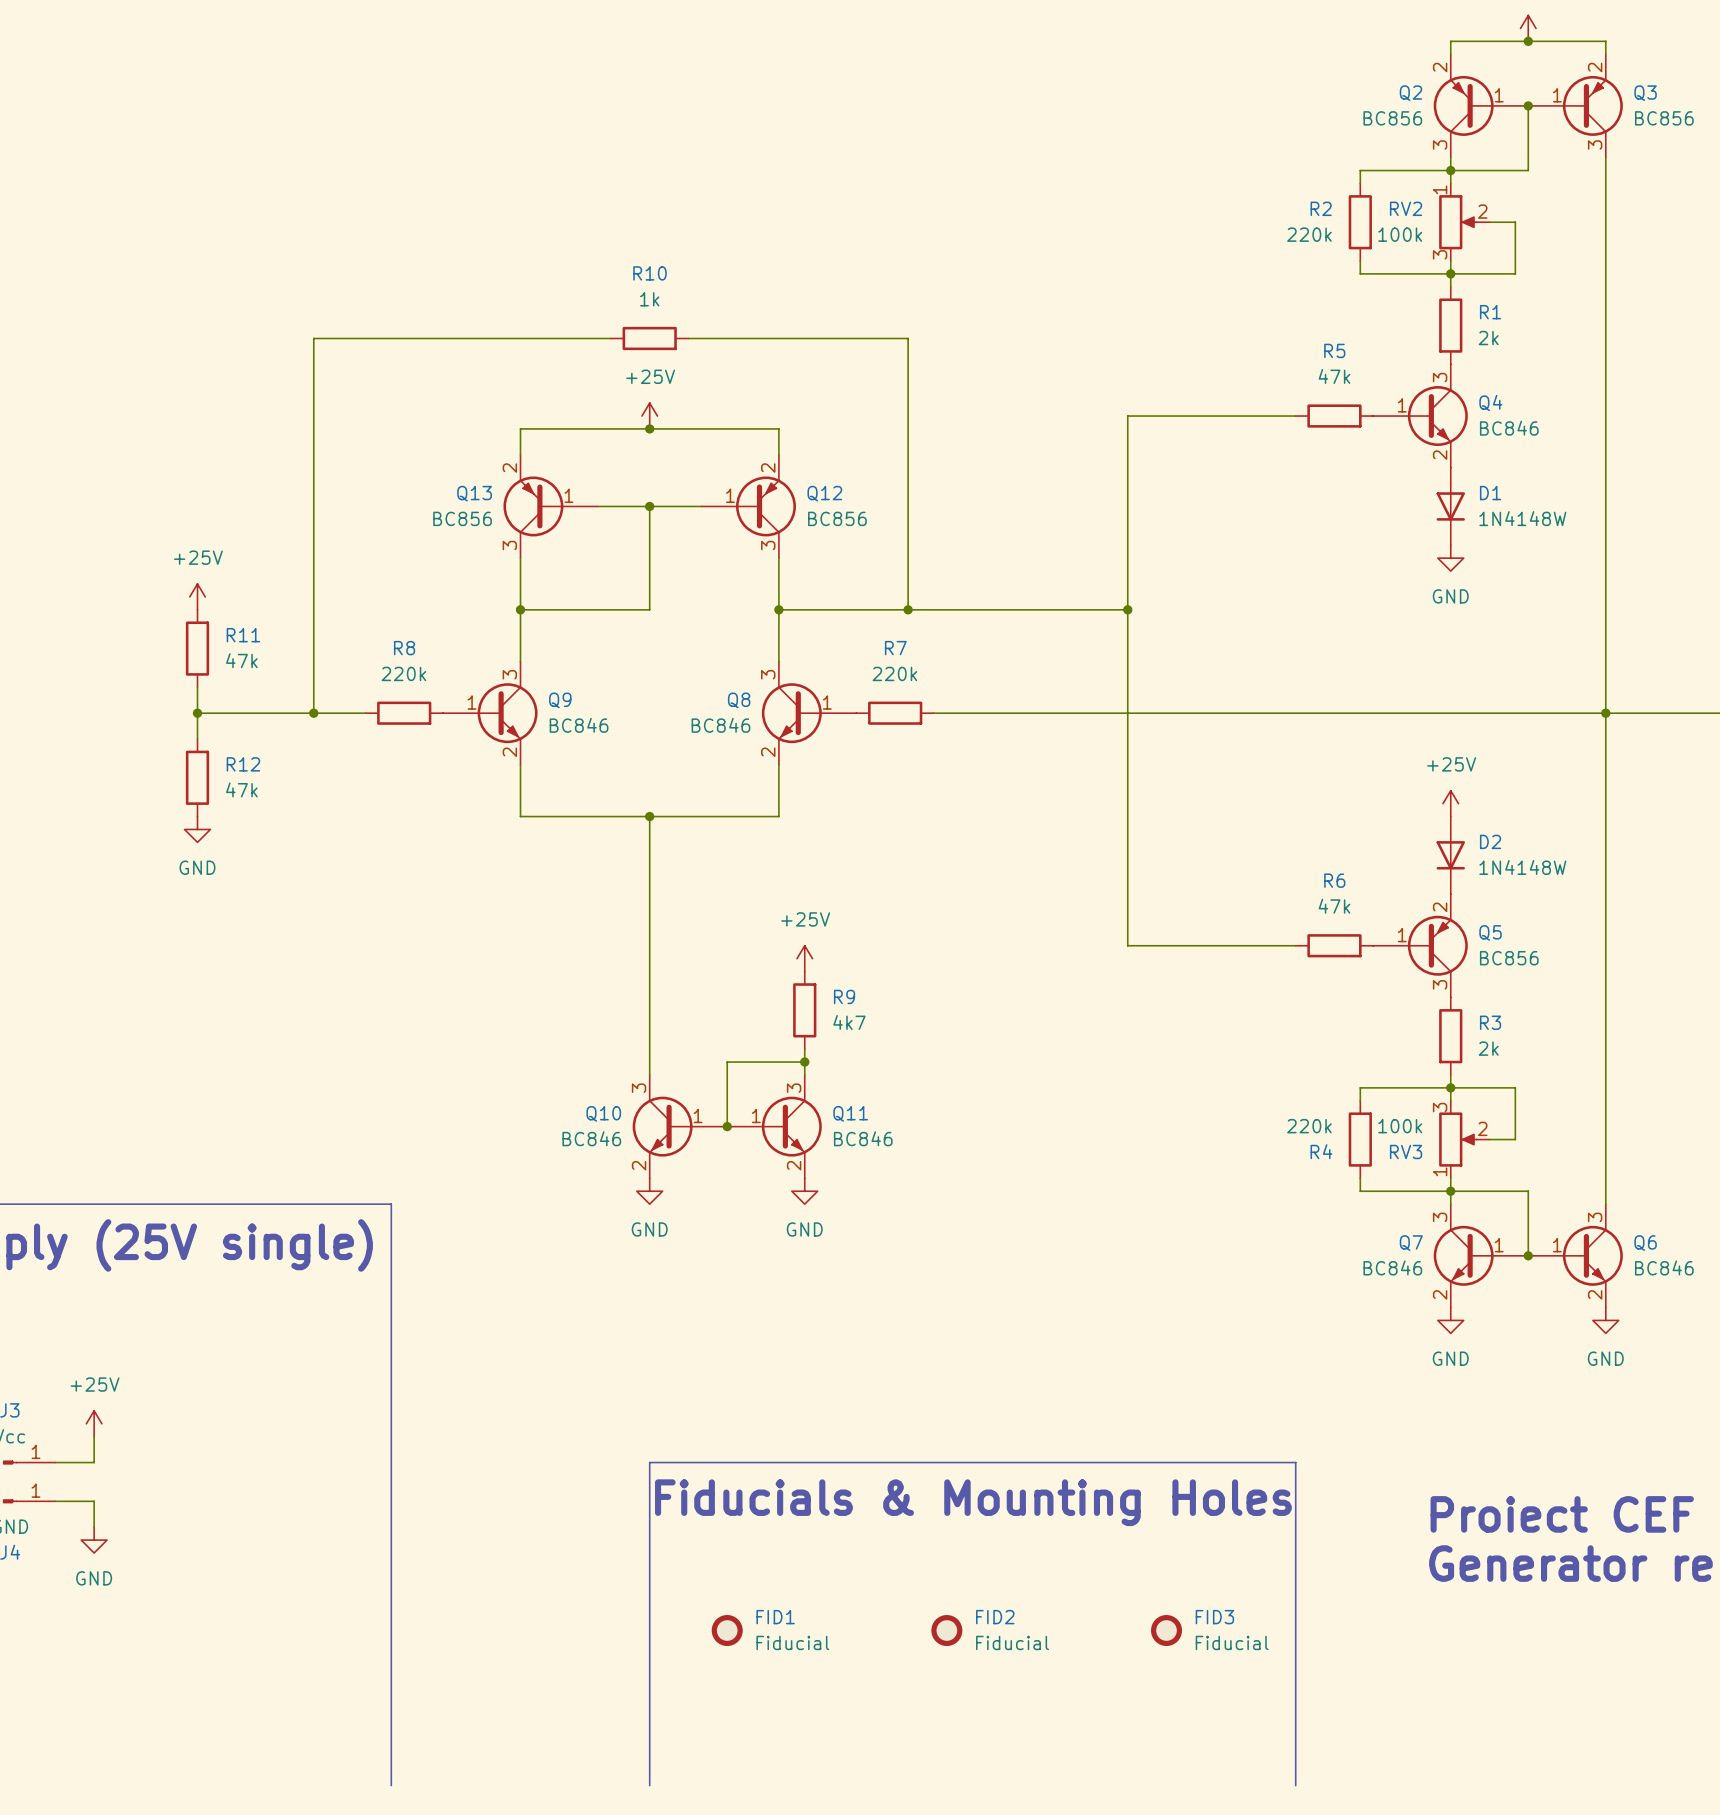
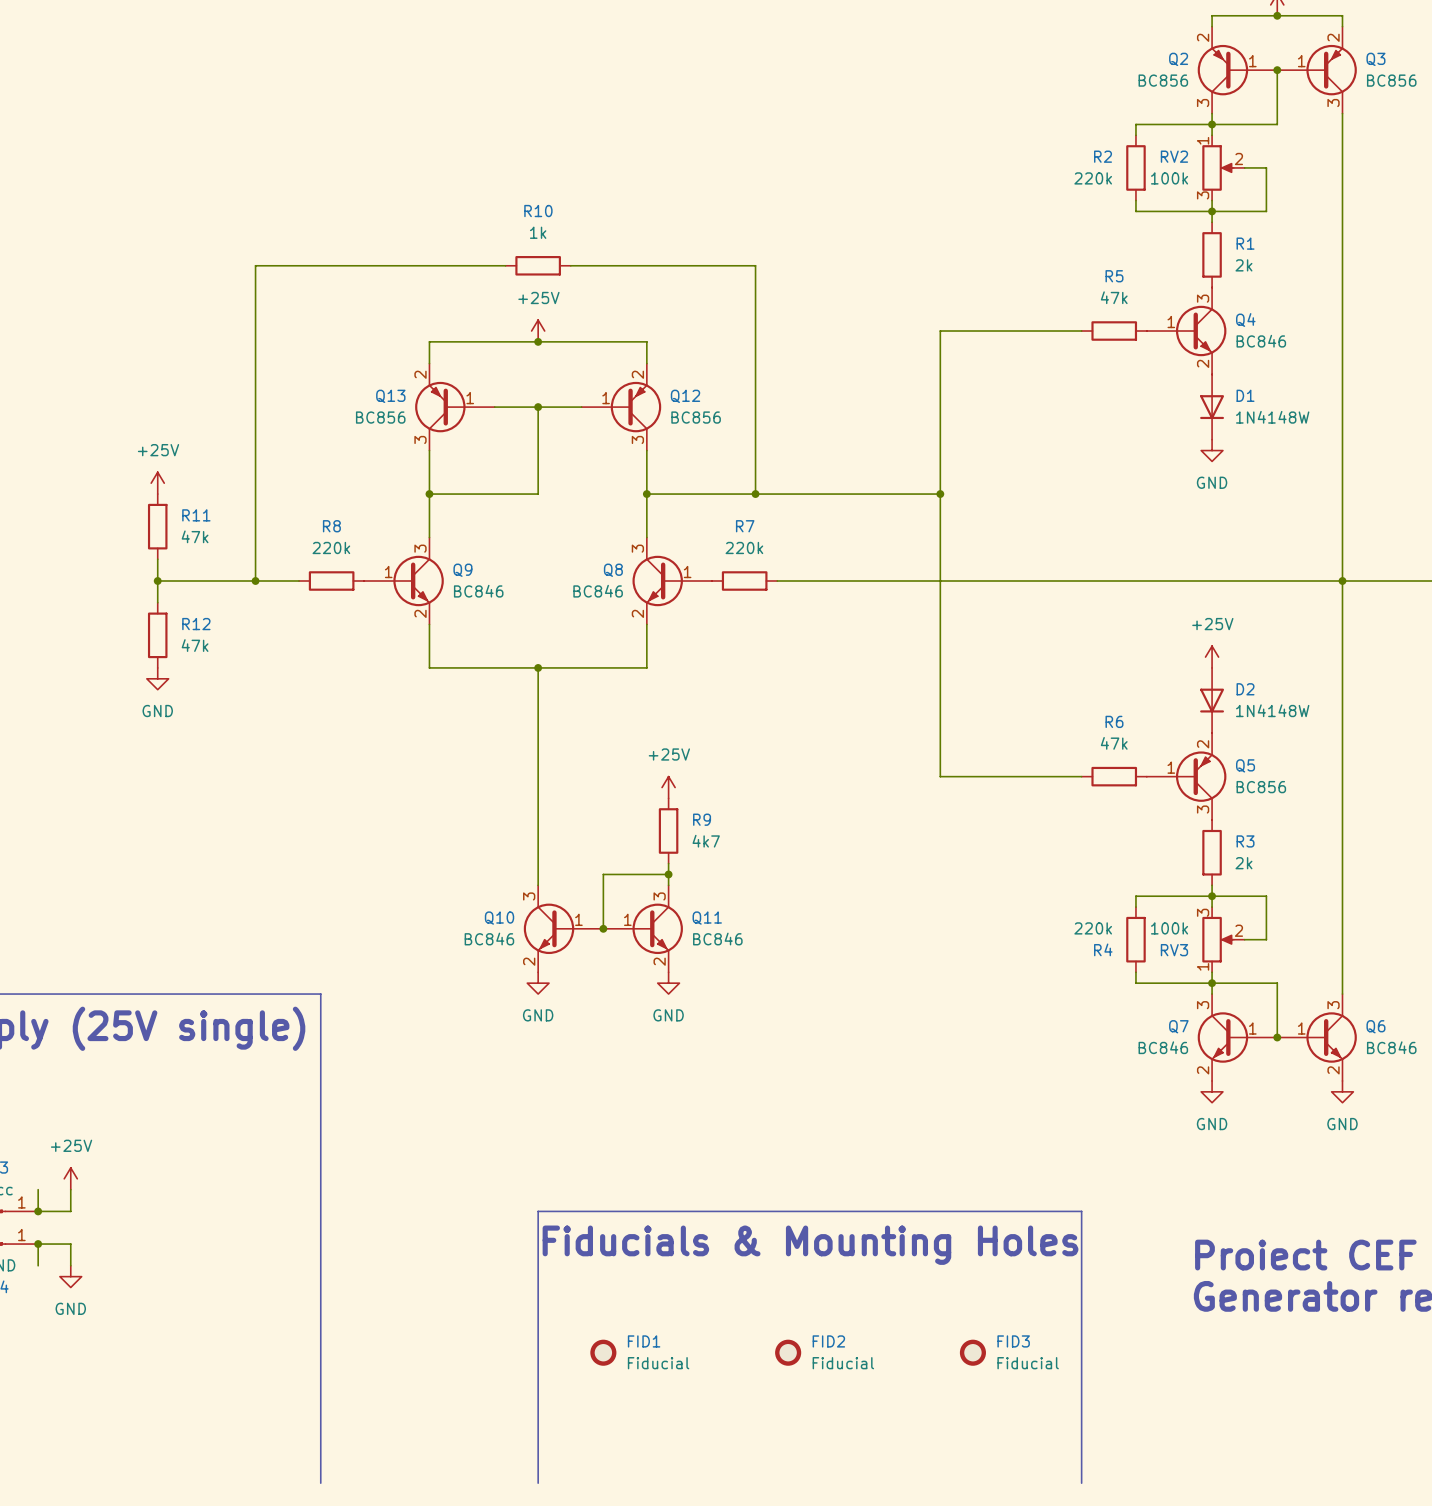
wire: none -> (38, 1189) (38, 1211)
junction: none -> (38, 1211)
wire: none -> (38, 1244) (38, 1265)
junction: none -> (38, 1244)

